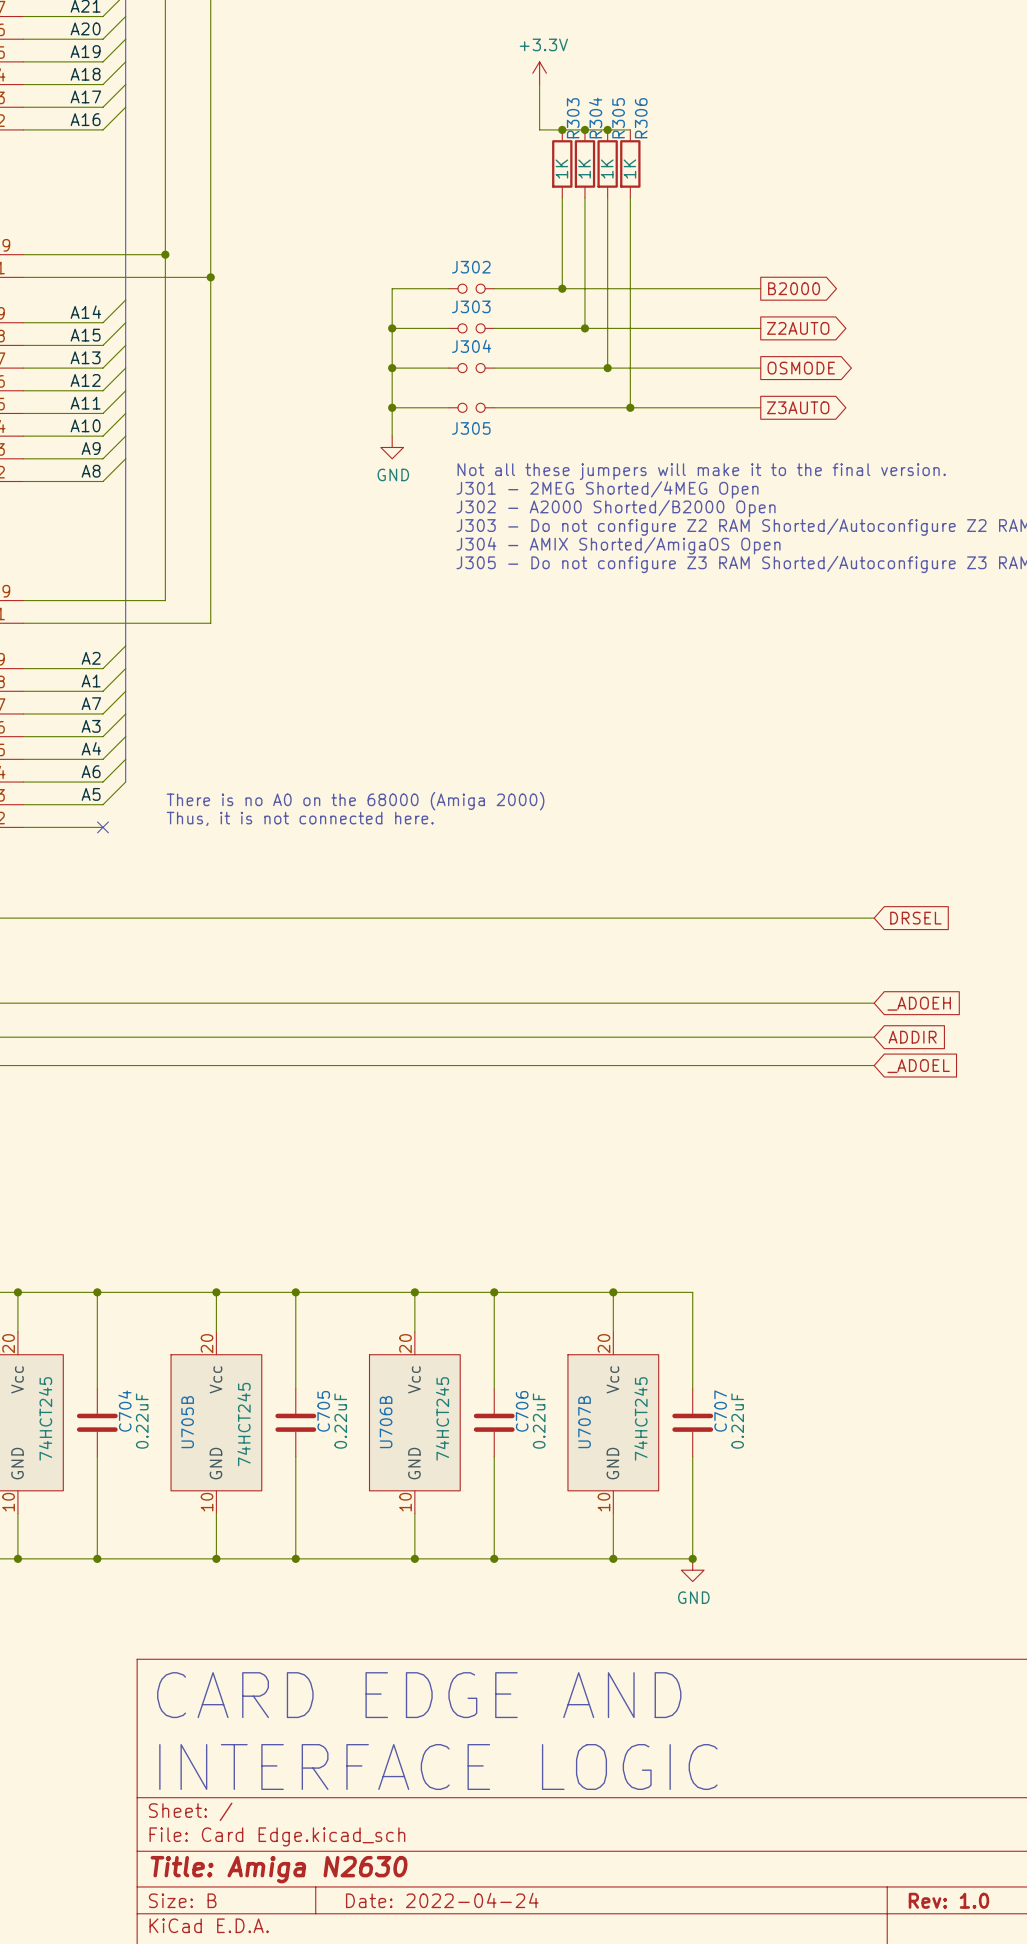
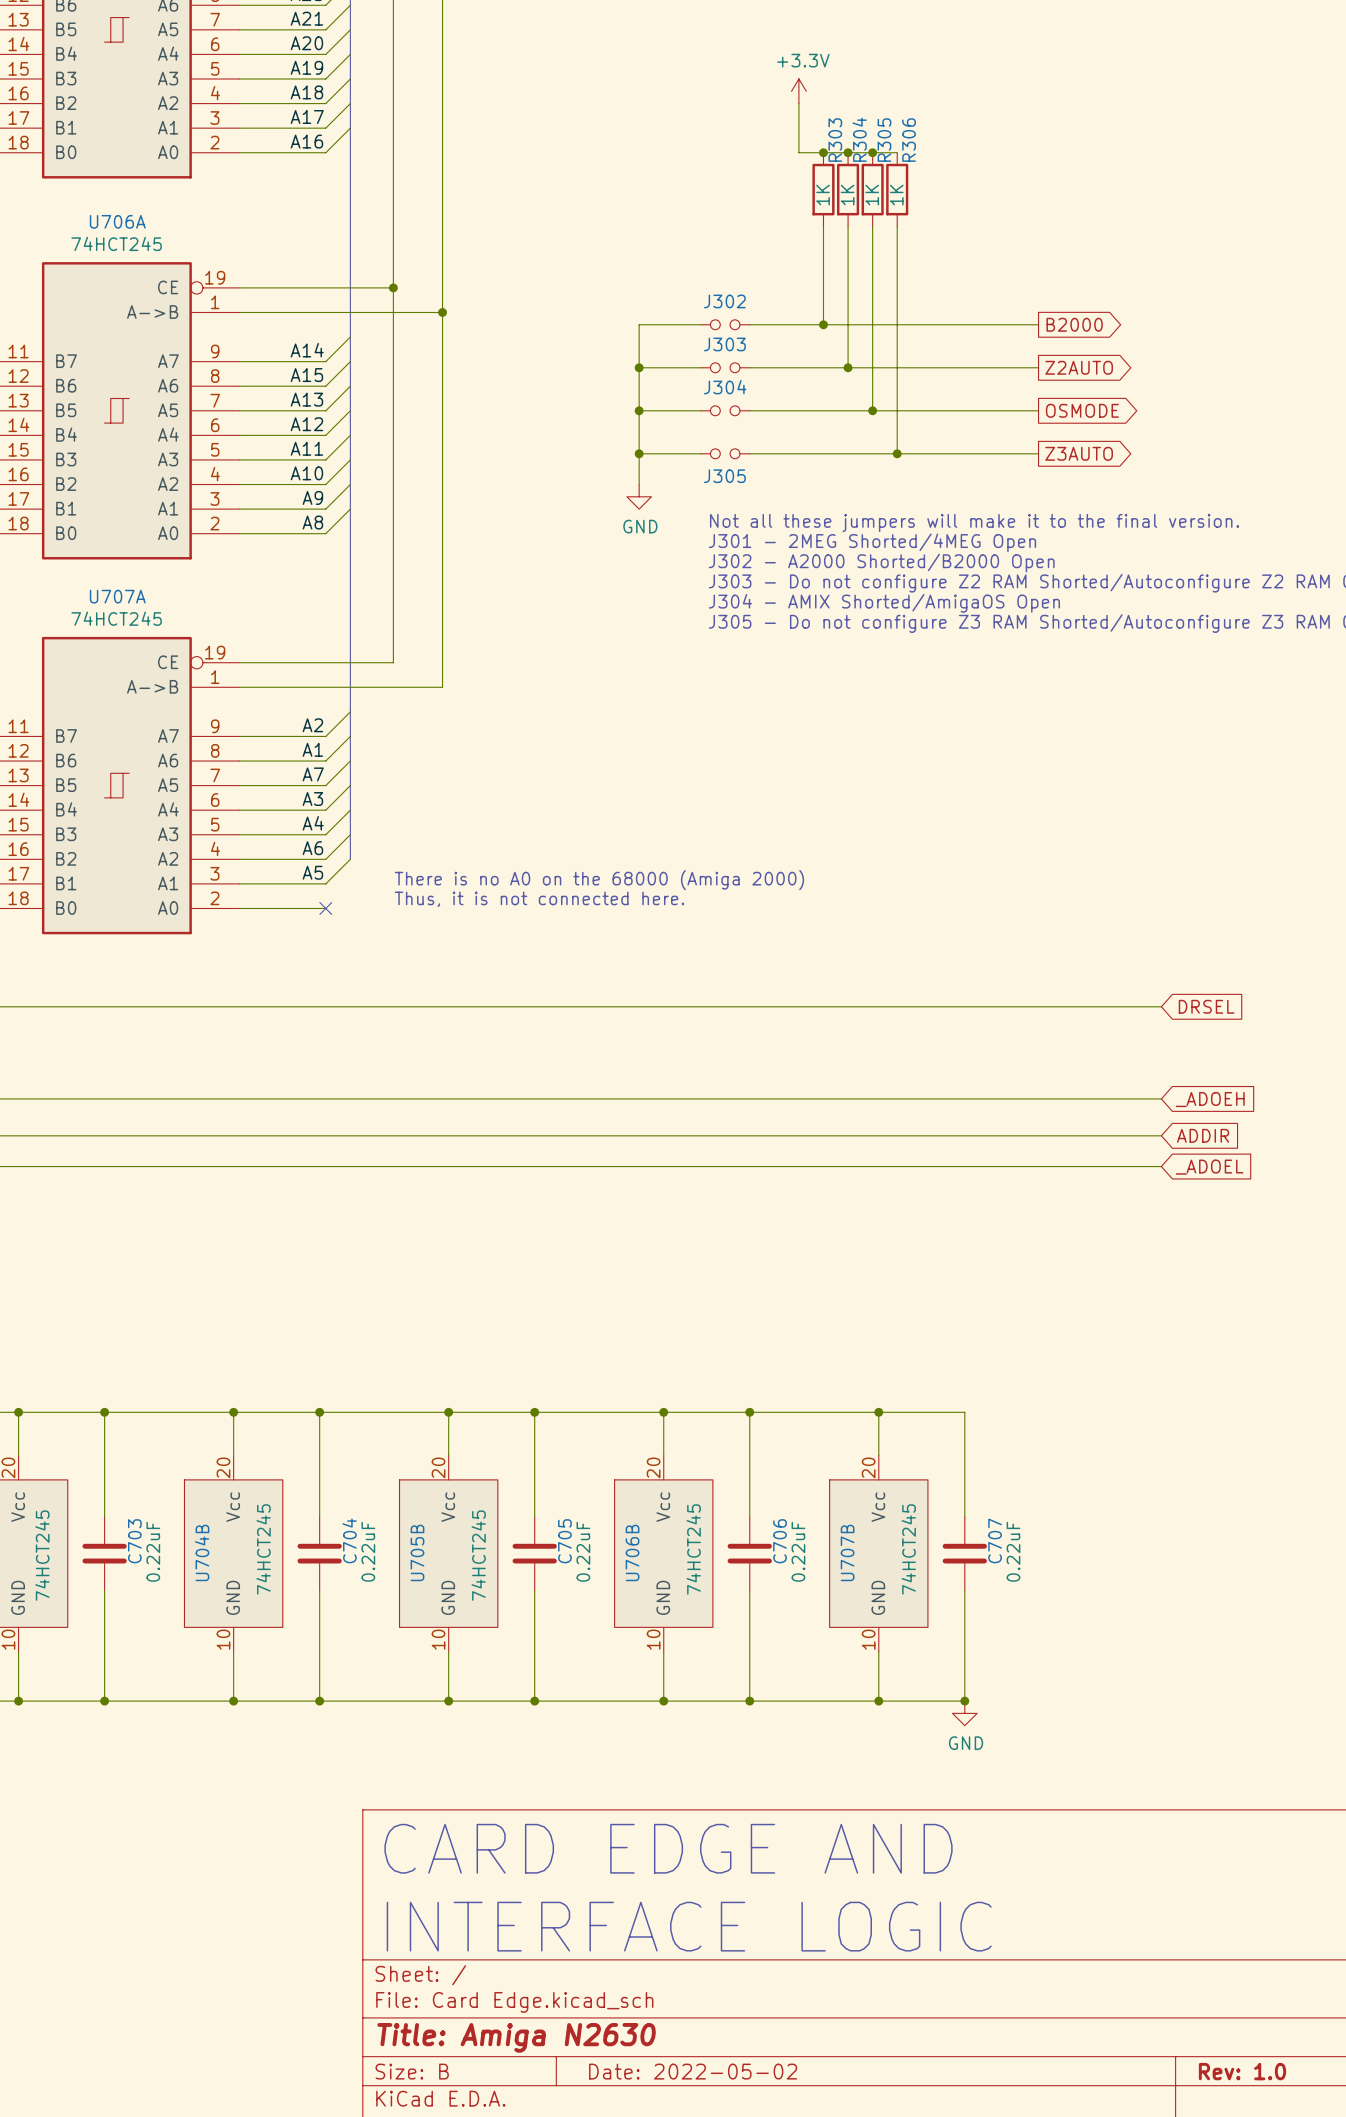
title block: Date: 2022-04-24 (442, 1900) -> Date: 2022-05-02 (693, 2071)

